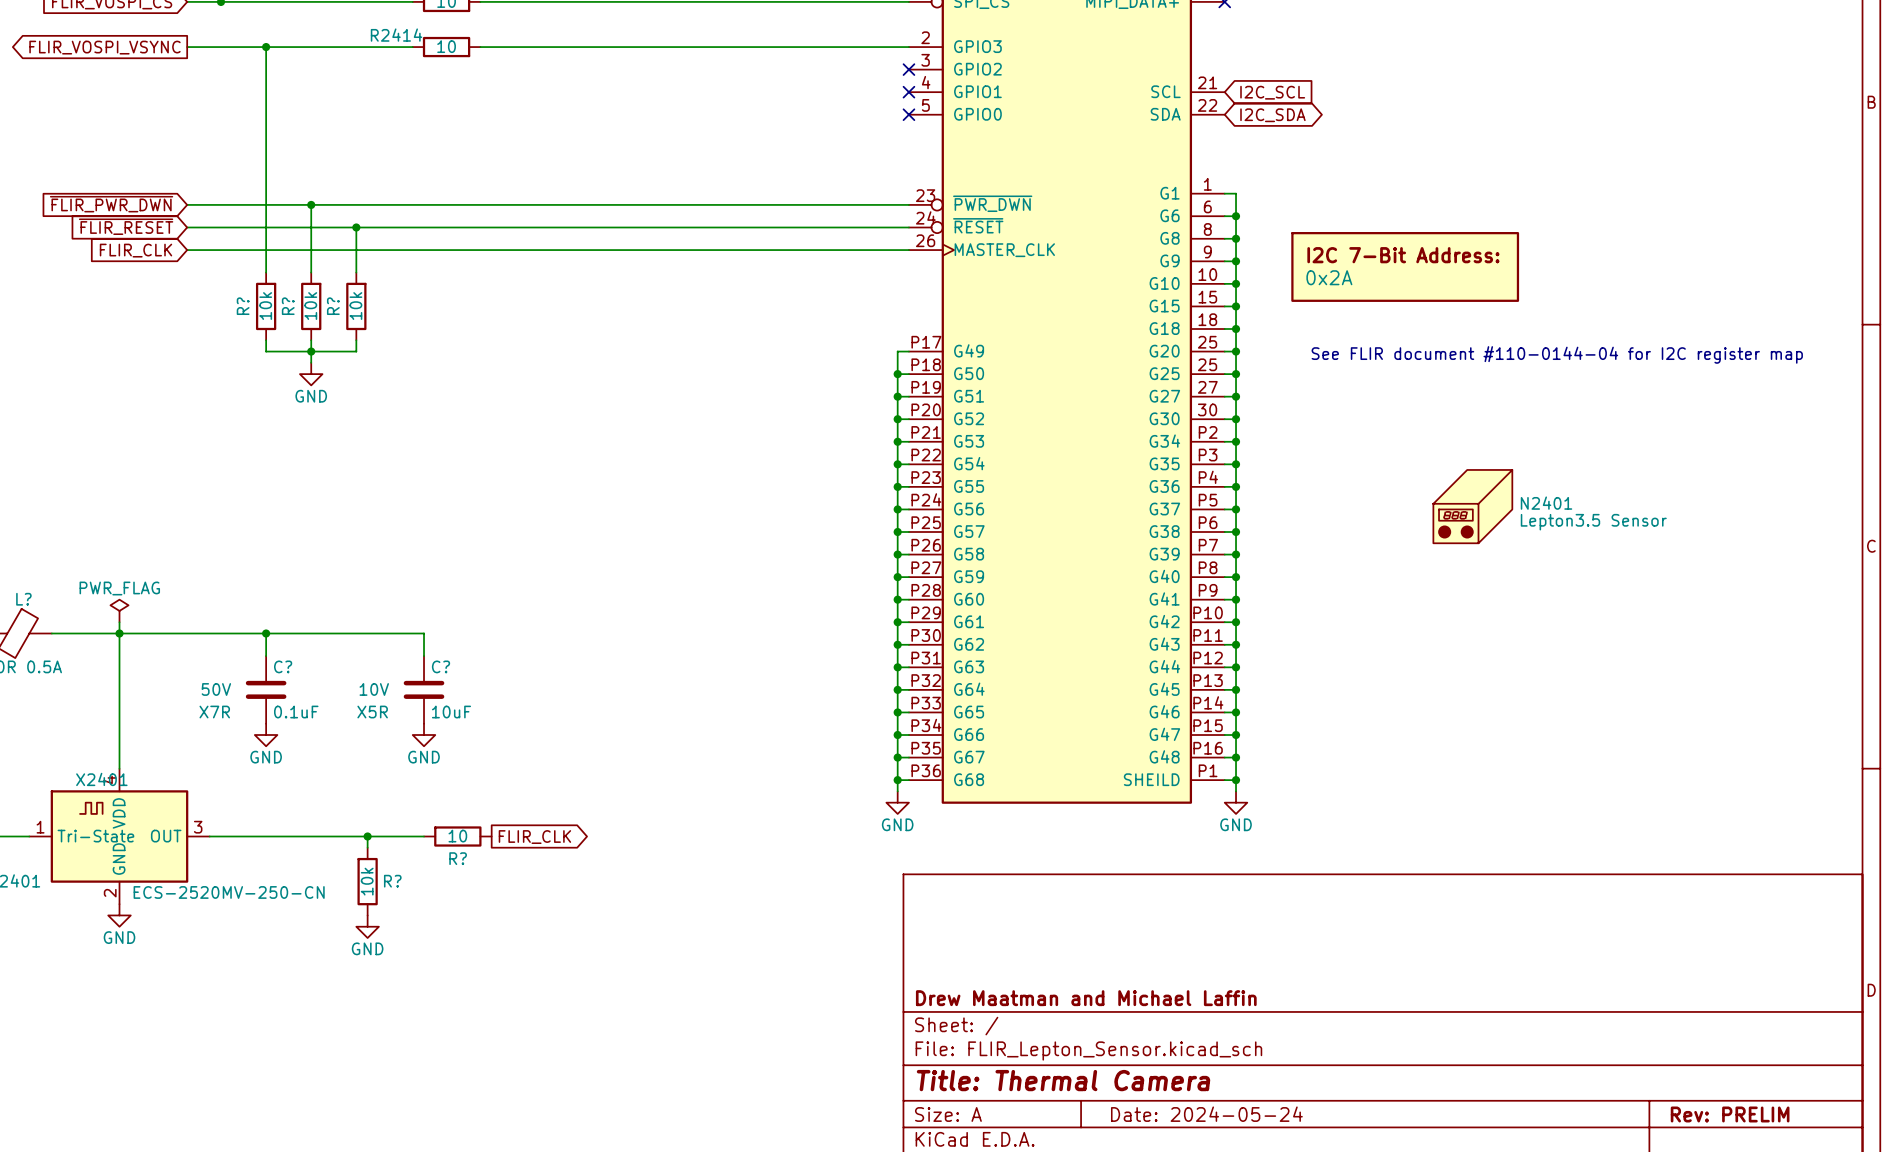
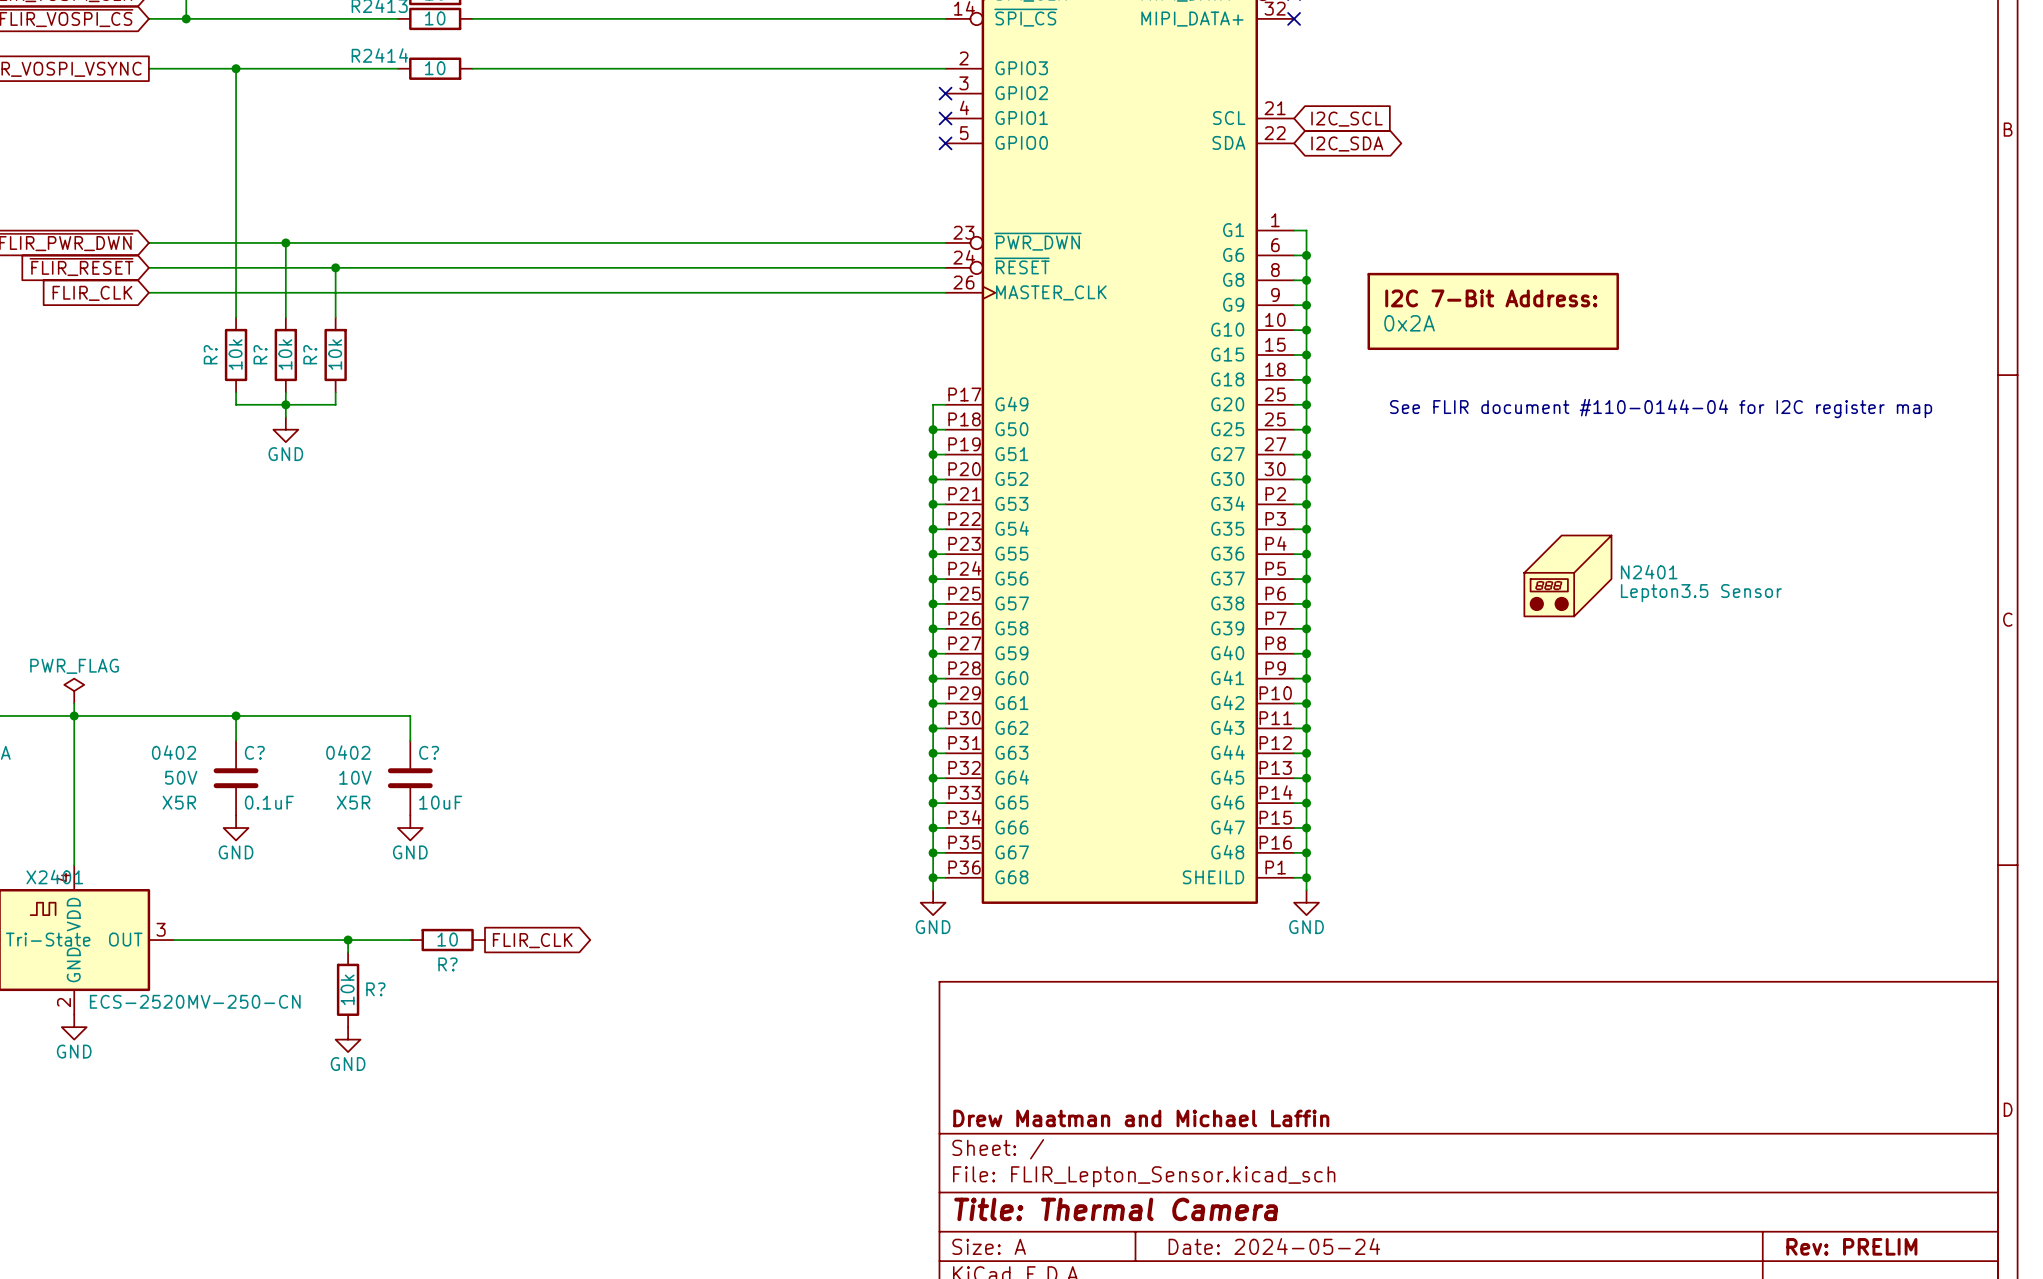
C? text: none -> 0402 (174, 752)
C? text: none -> 0402 (348, 752)
C? text: X7R (214, 712) -> X5R (179, 802)

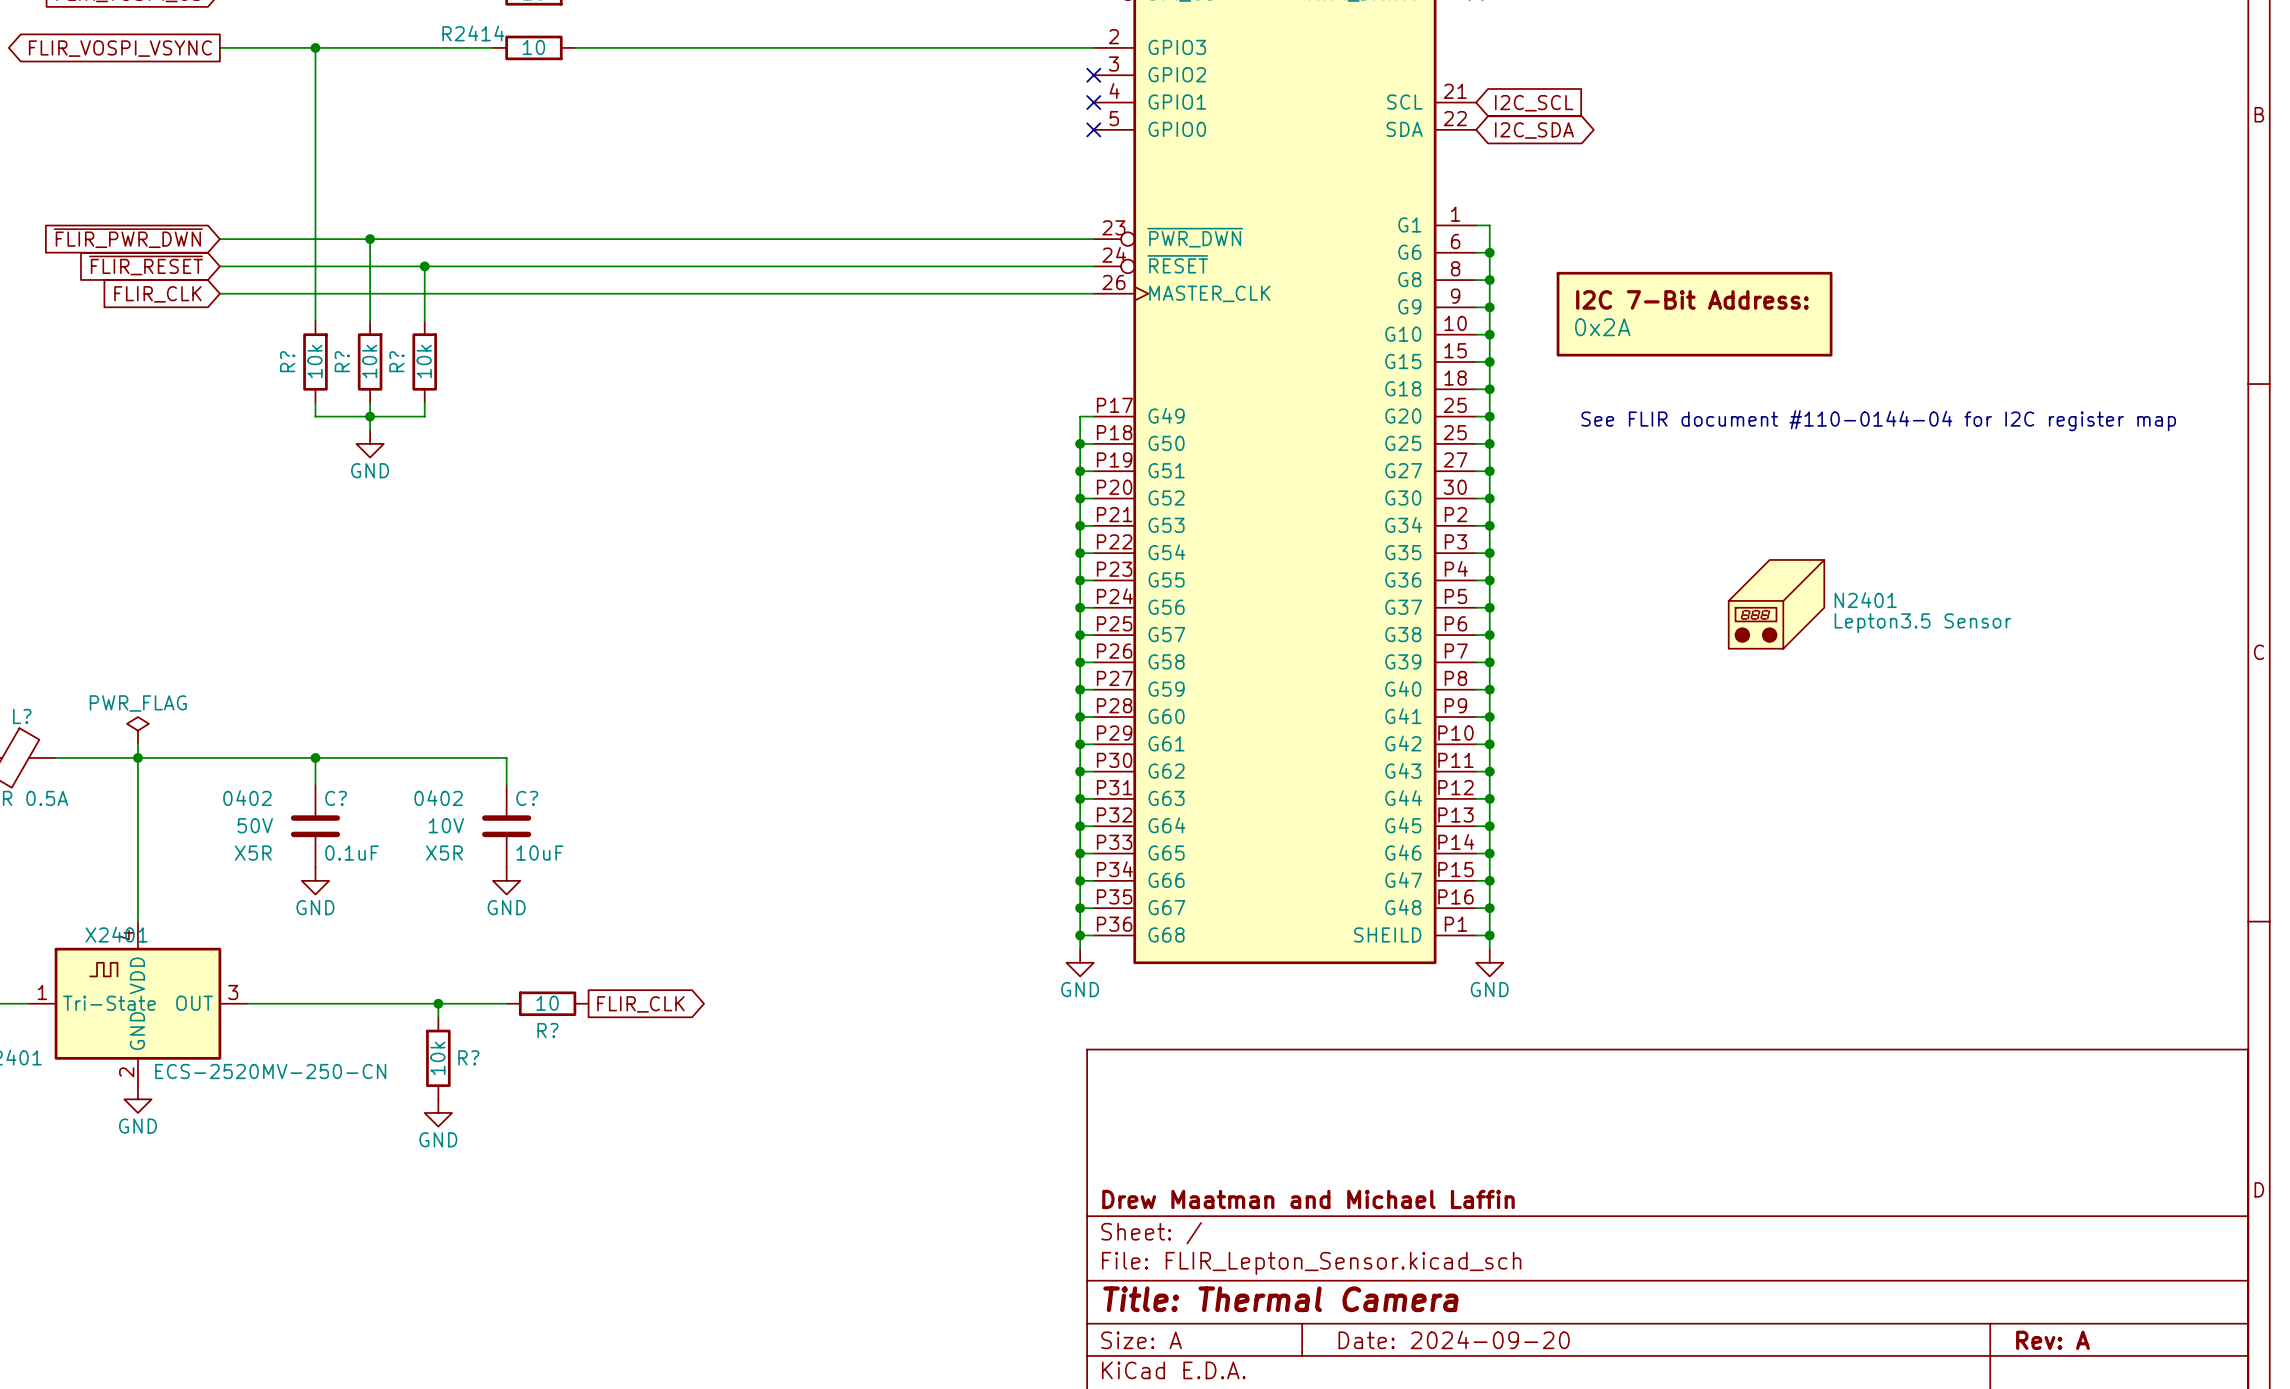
title block: Date: 2024-05-24 (1274, 1246) -> Date: 2024-09-20 (1454, 1339)
title block: Rev: PRELIM (1851, 1246) -> Rev: A (2053, 1340)

